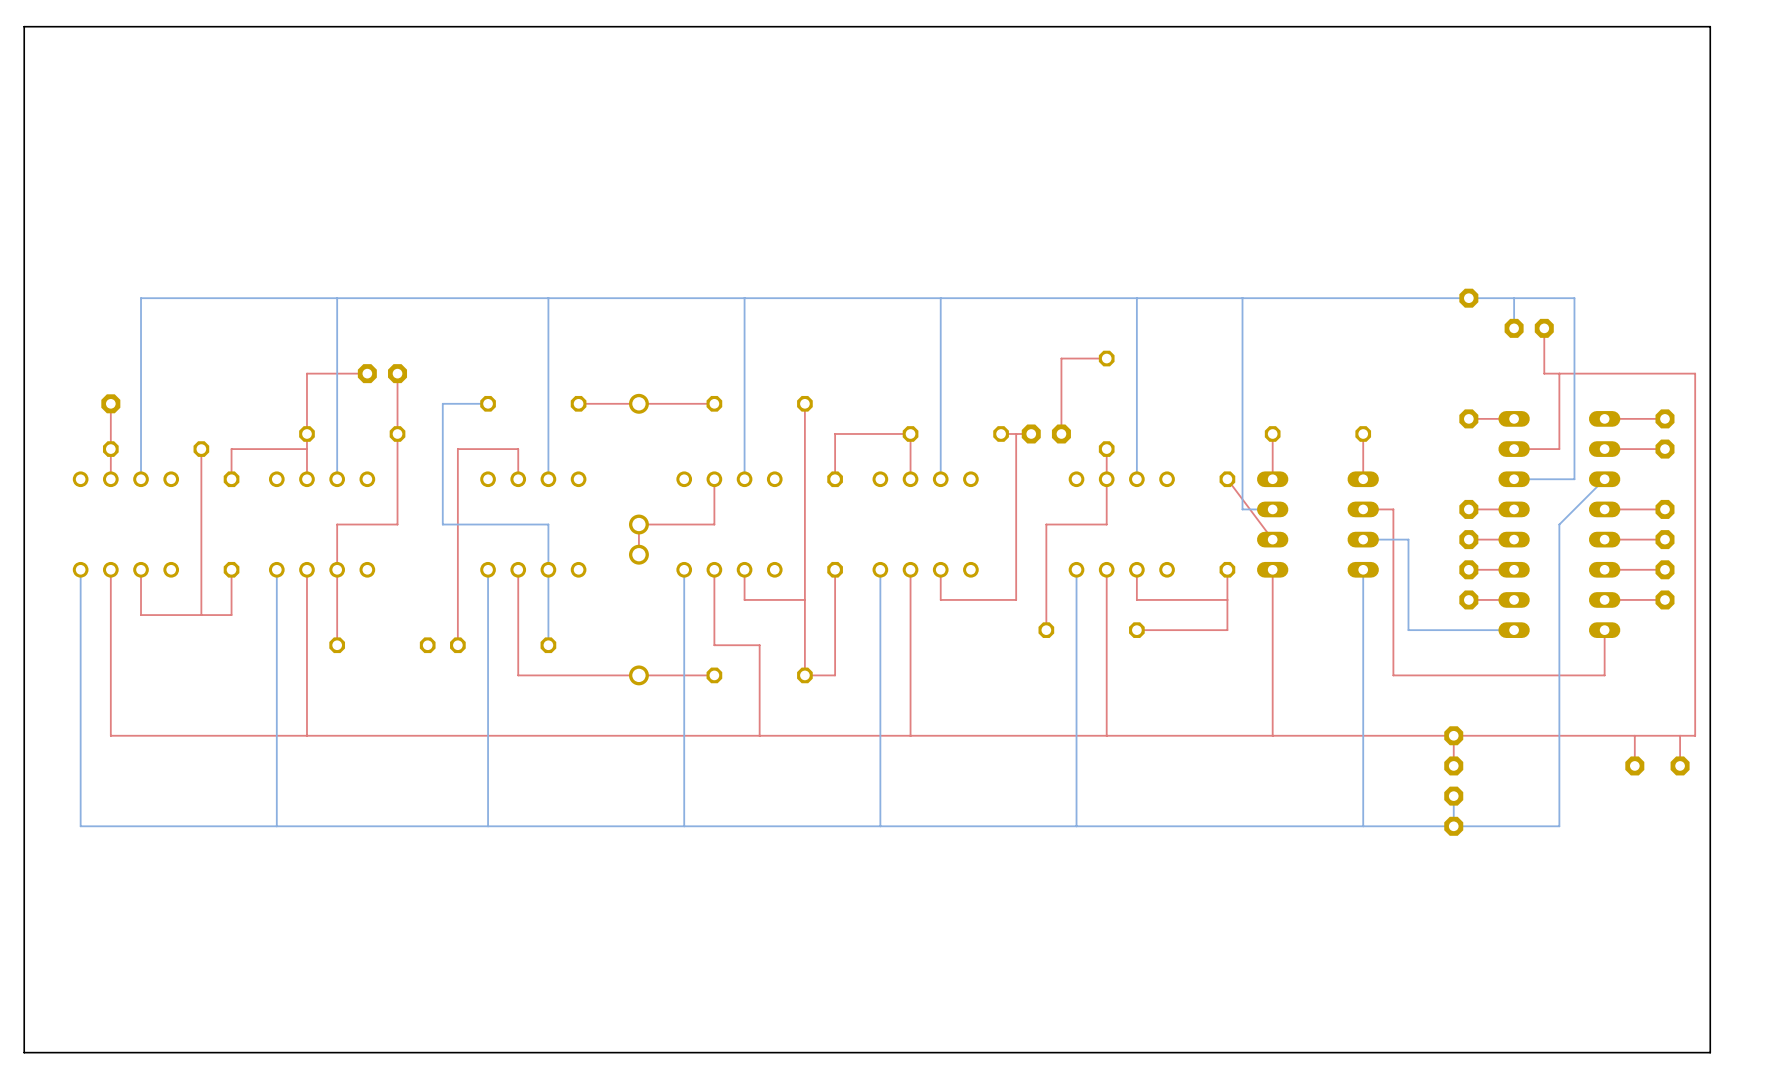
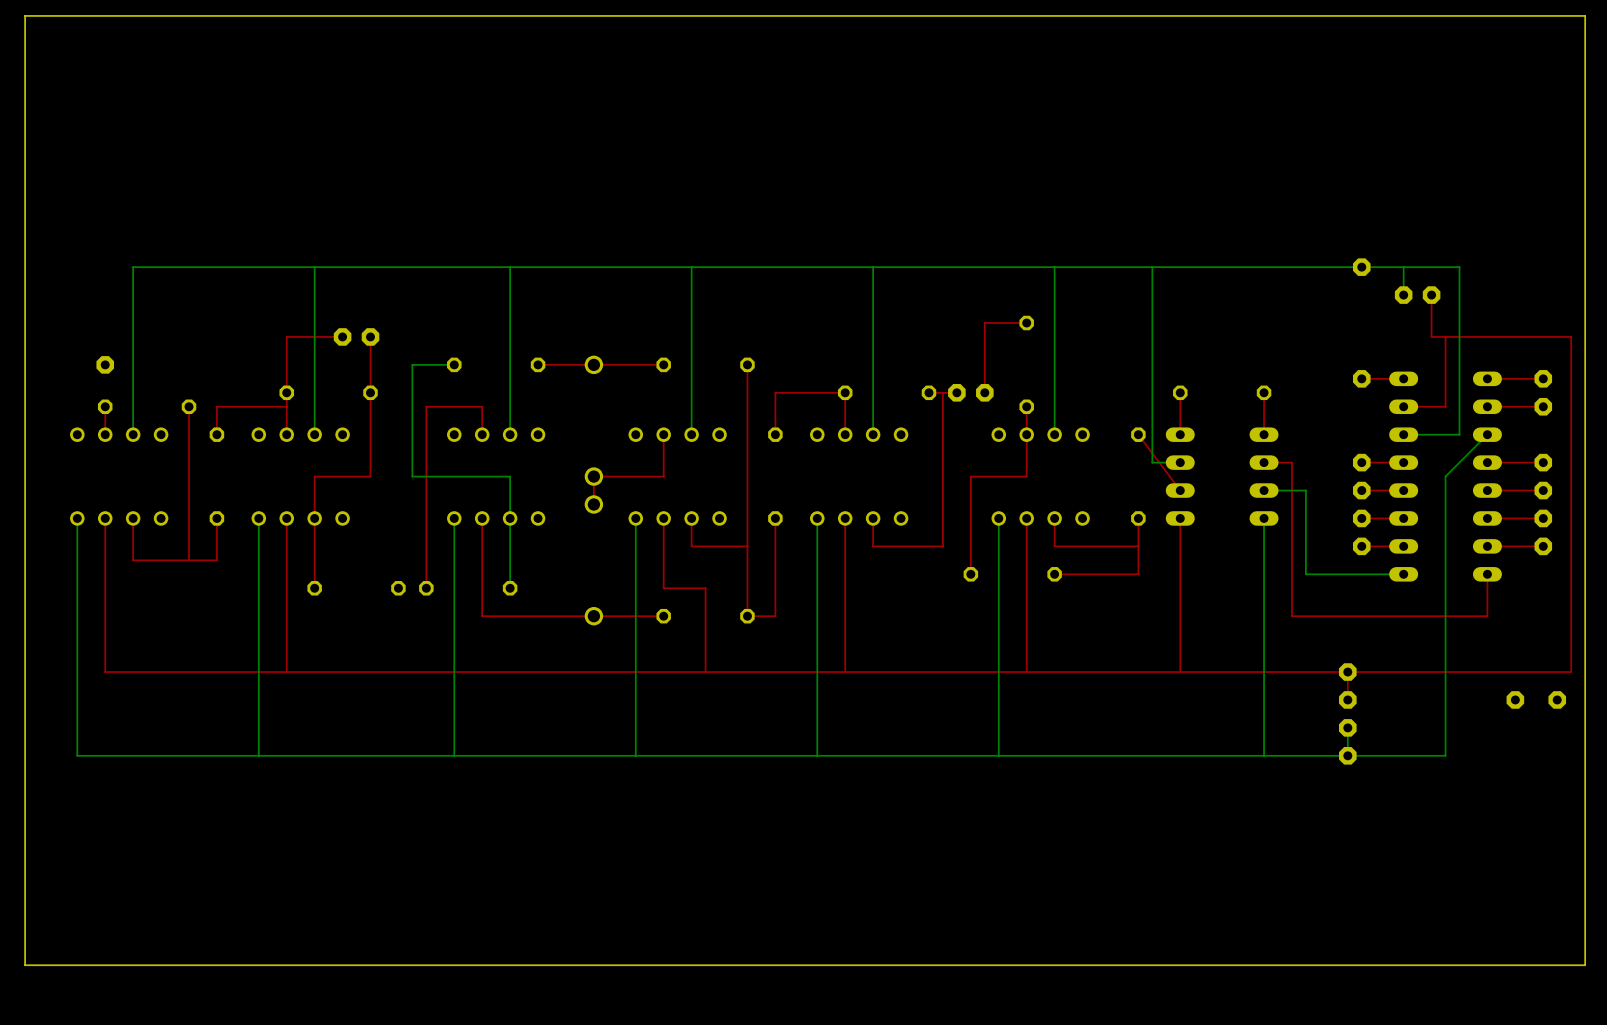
top track: (110, 403) (110, 449) -> none
top track: (1634, 735) (1634, 765) -> none
top track: (1680, 735) (1680, 765) -> none

